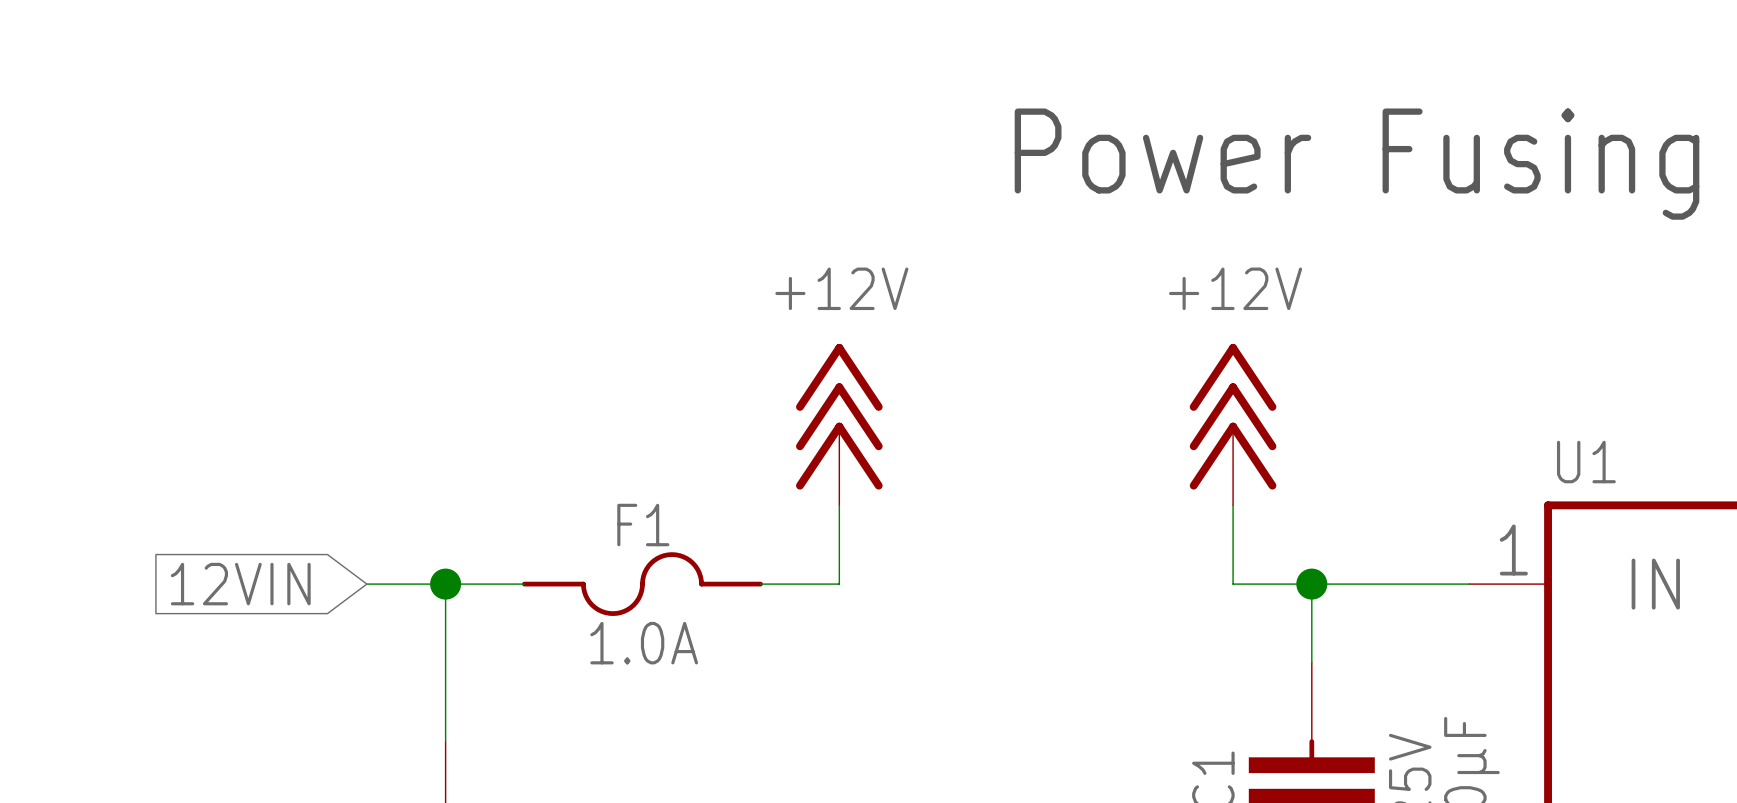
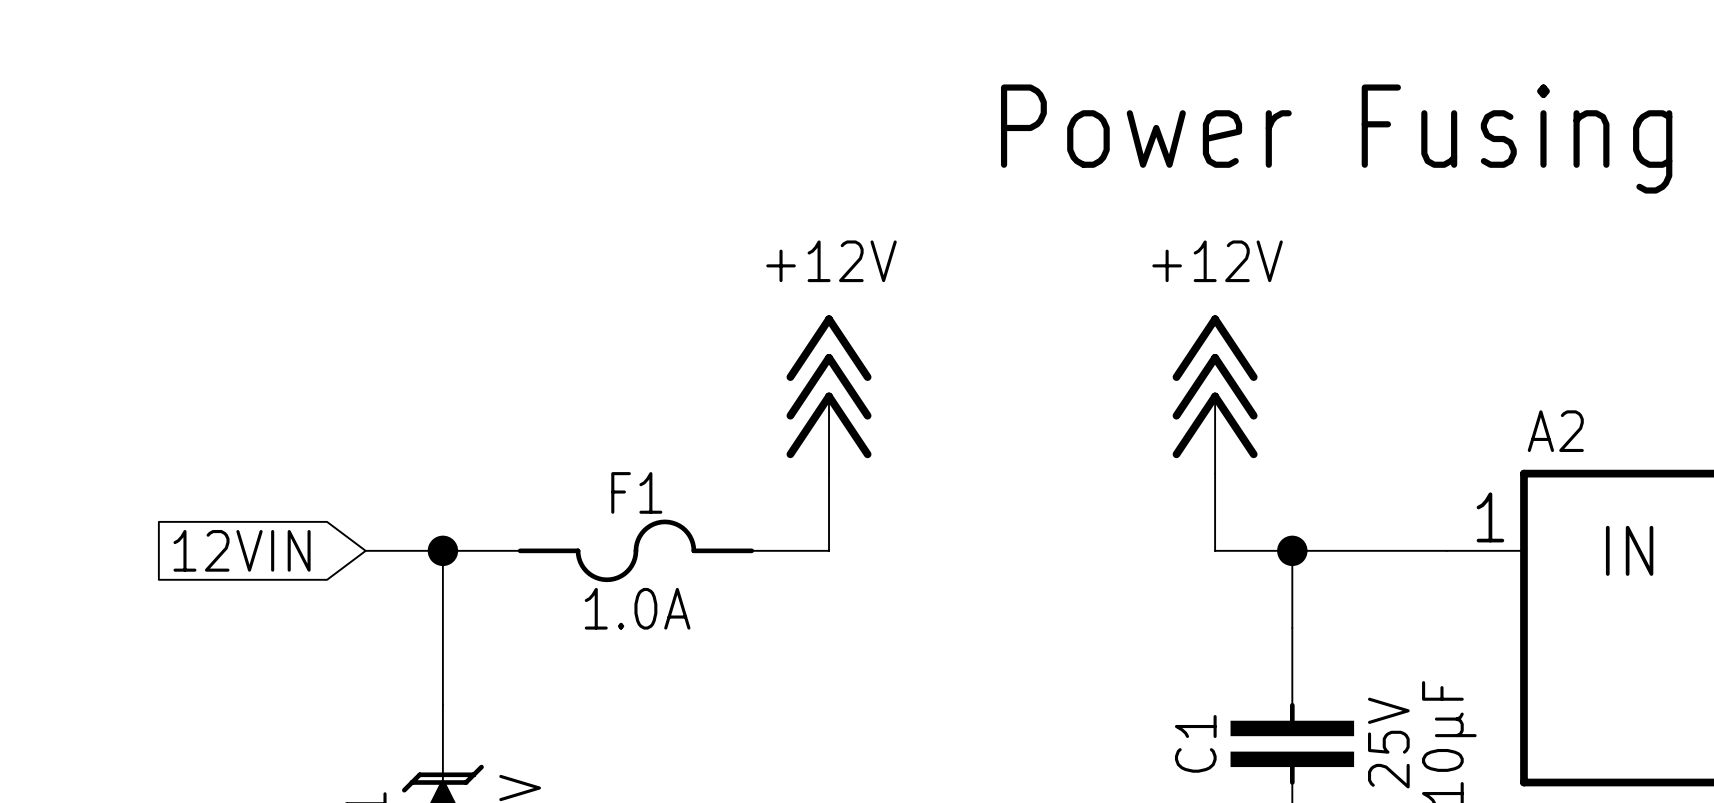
U1 name: U1 (1586, 462) -> A2 (1555, 431)

